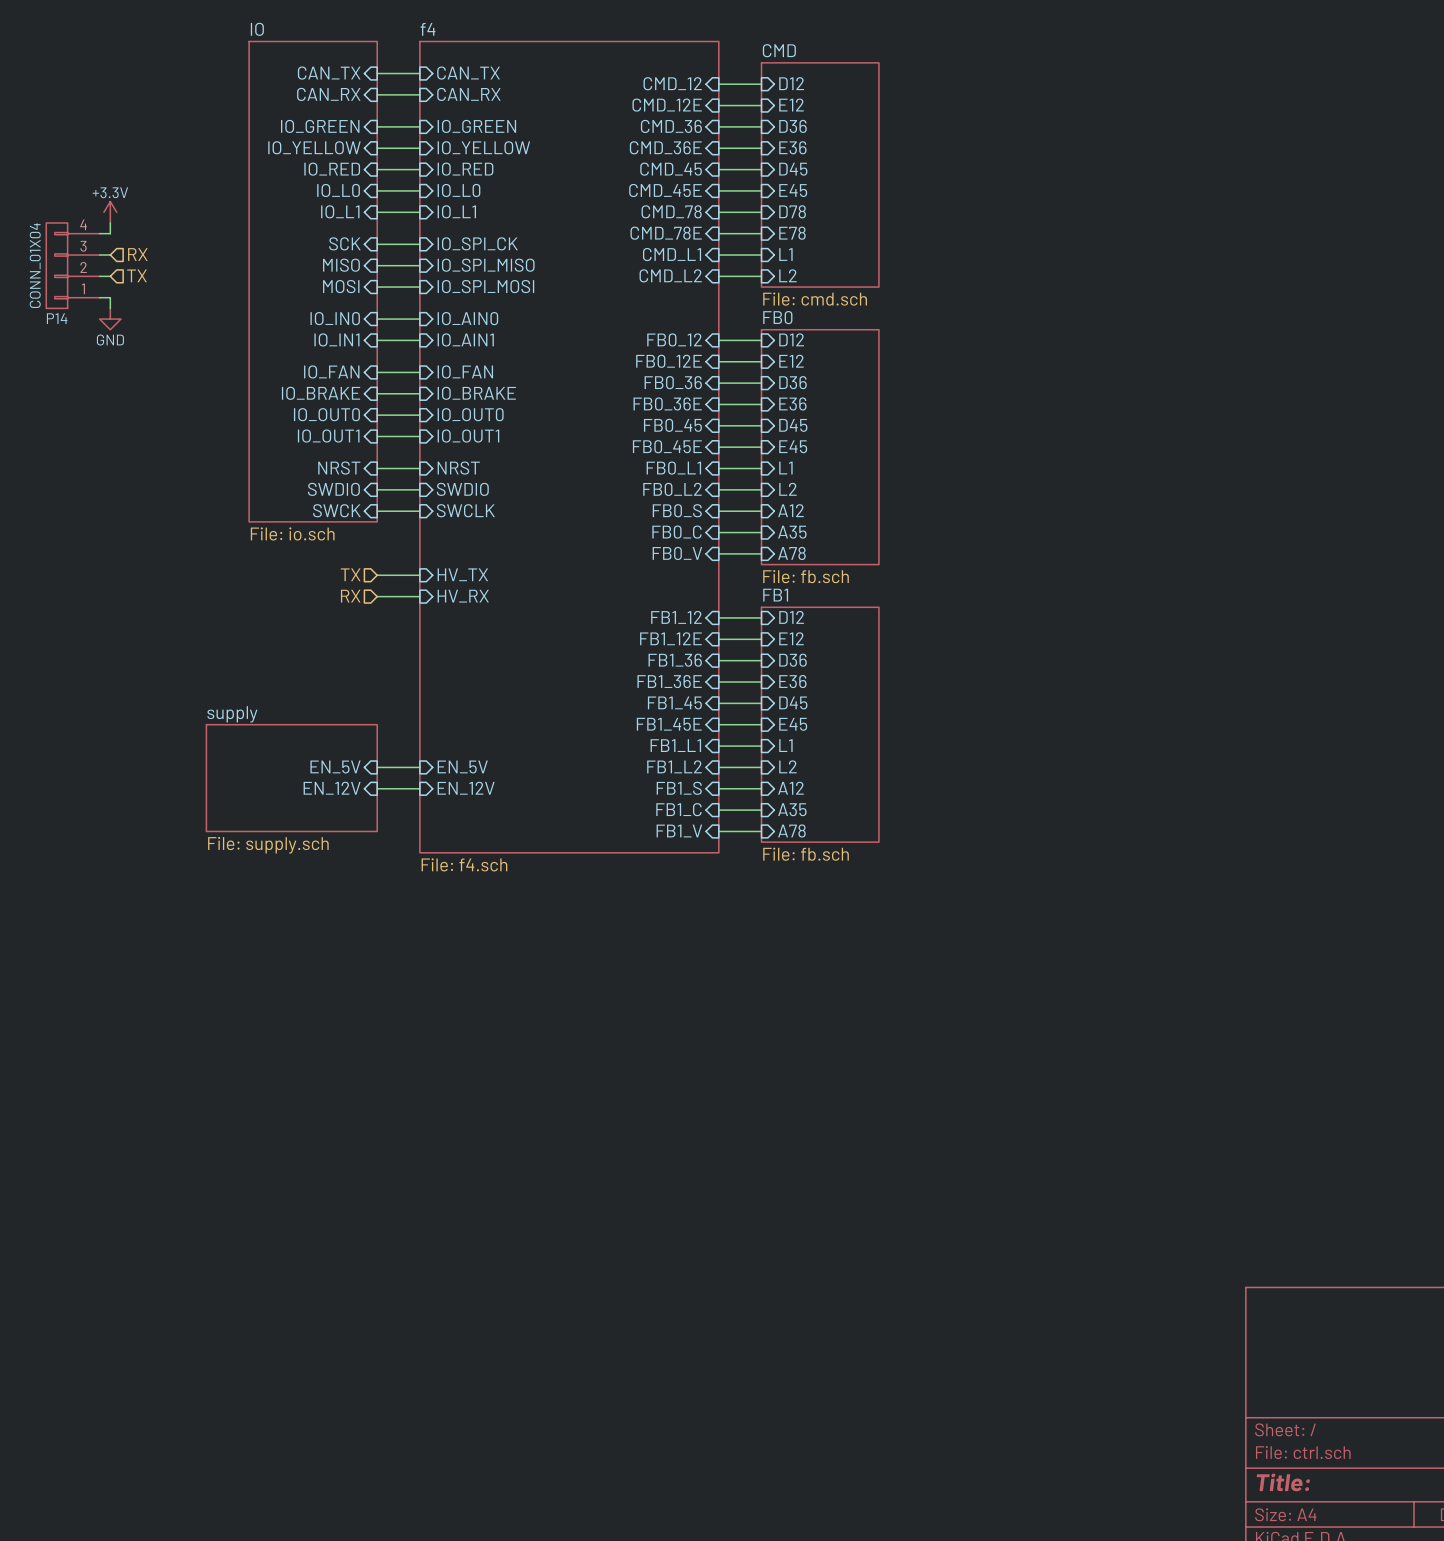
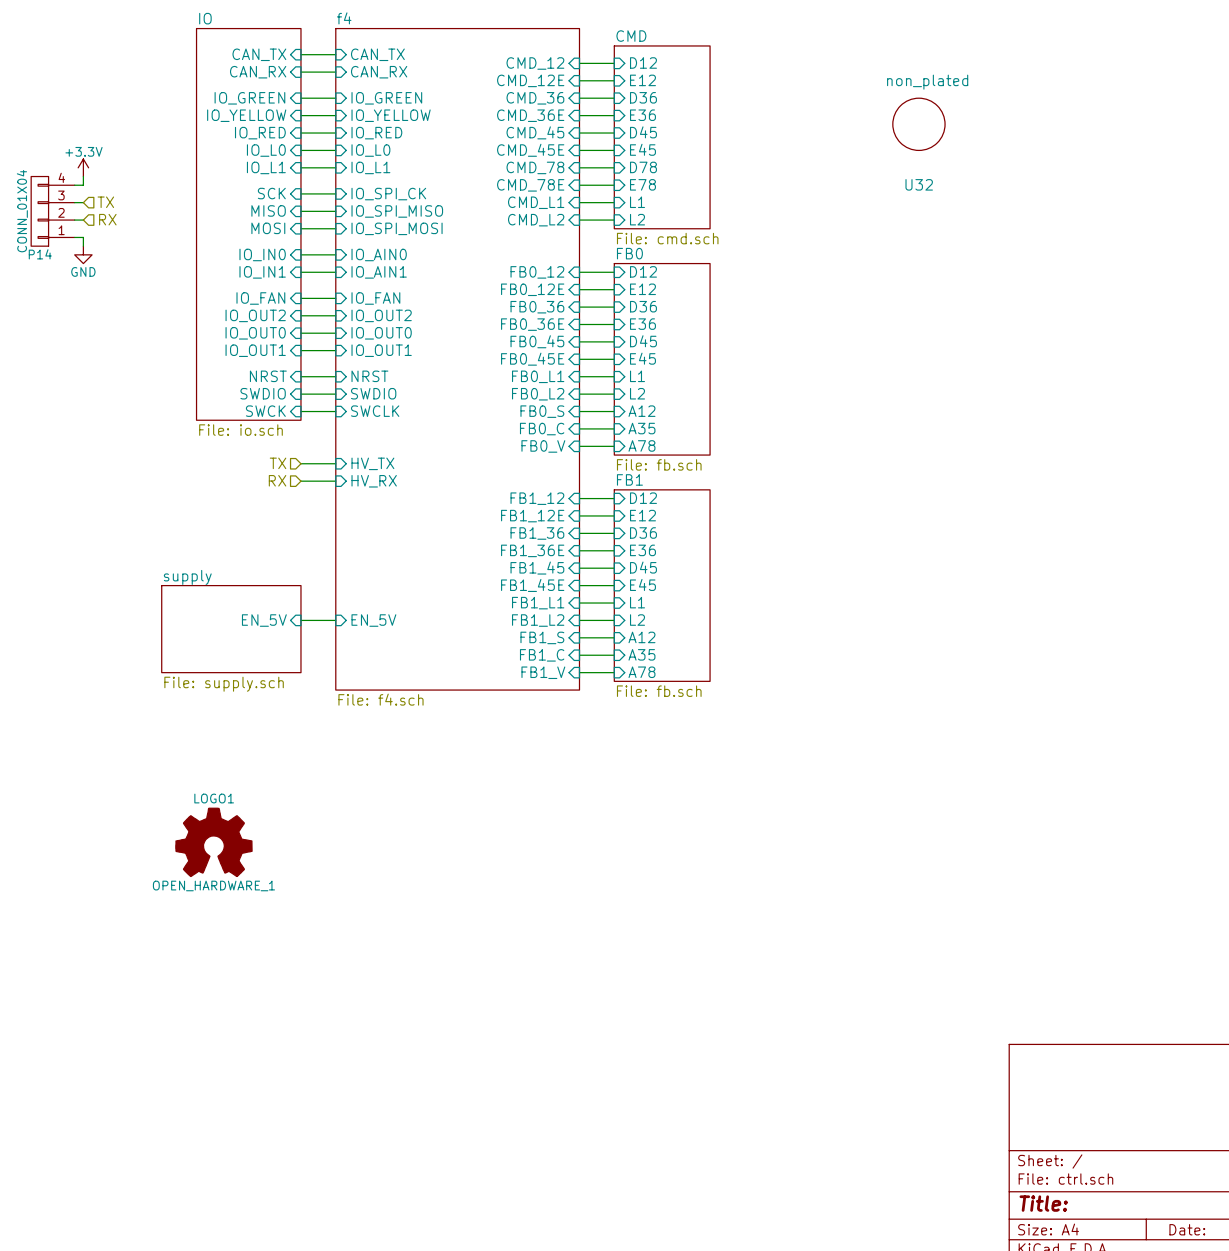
U32: none -> non_plated (918, 124)
hierarchical label: RX (137, 254) -> TX (105, 202)
hierarchical label: TX (136, 275) -> RX (107, 219)
sheet pin: IO_BRAKE (321, 393) -> IO_OUT2 (255, 315)
sheet pin: IO_BRAKE (476, 393) -> IO_OUT2 (381, 315)
sheet pin: EN_12V (332, 788) -> none
wire: (377, 788) (419, 788) -> none
sheet pin: EN_12V (466, 788) -> none
LOGO1: none -> OPEN_HARDWARE_1 (213, 842)

